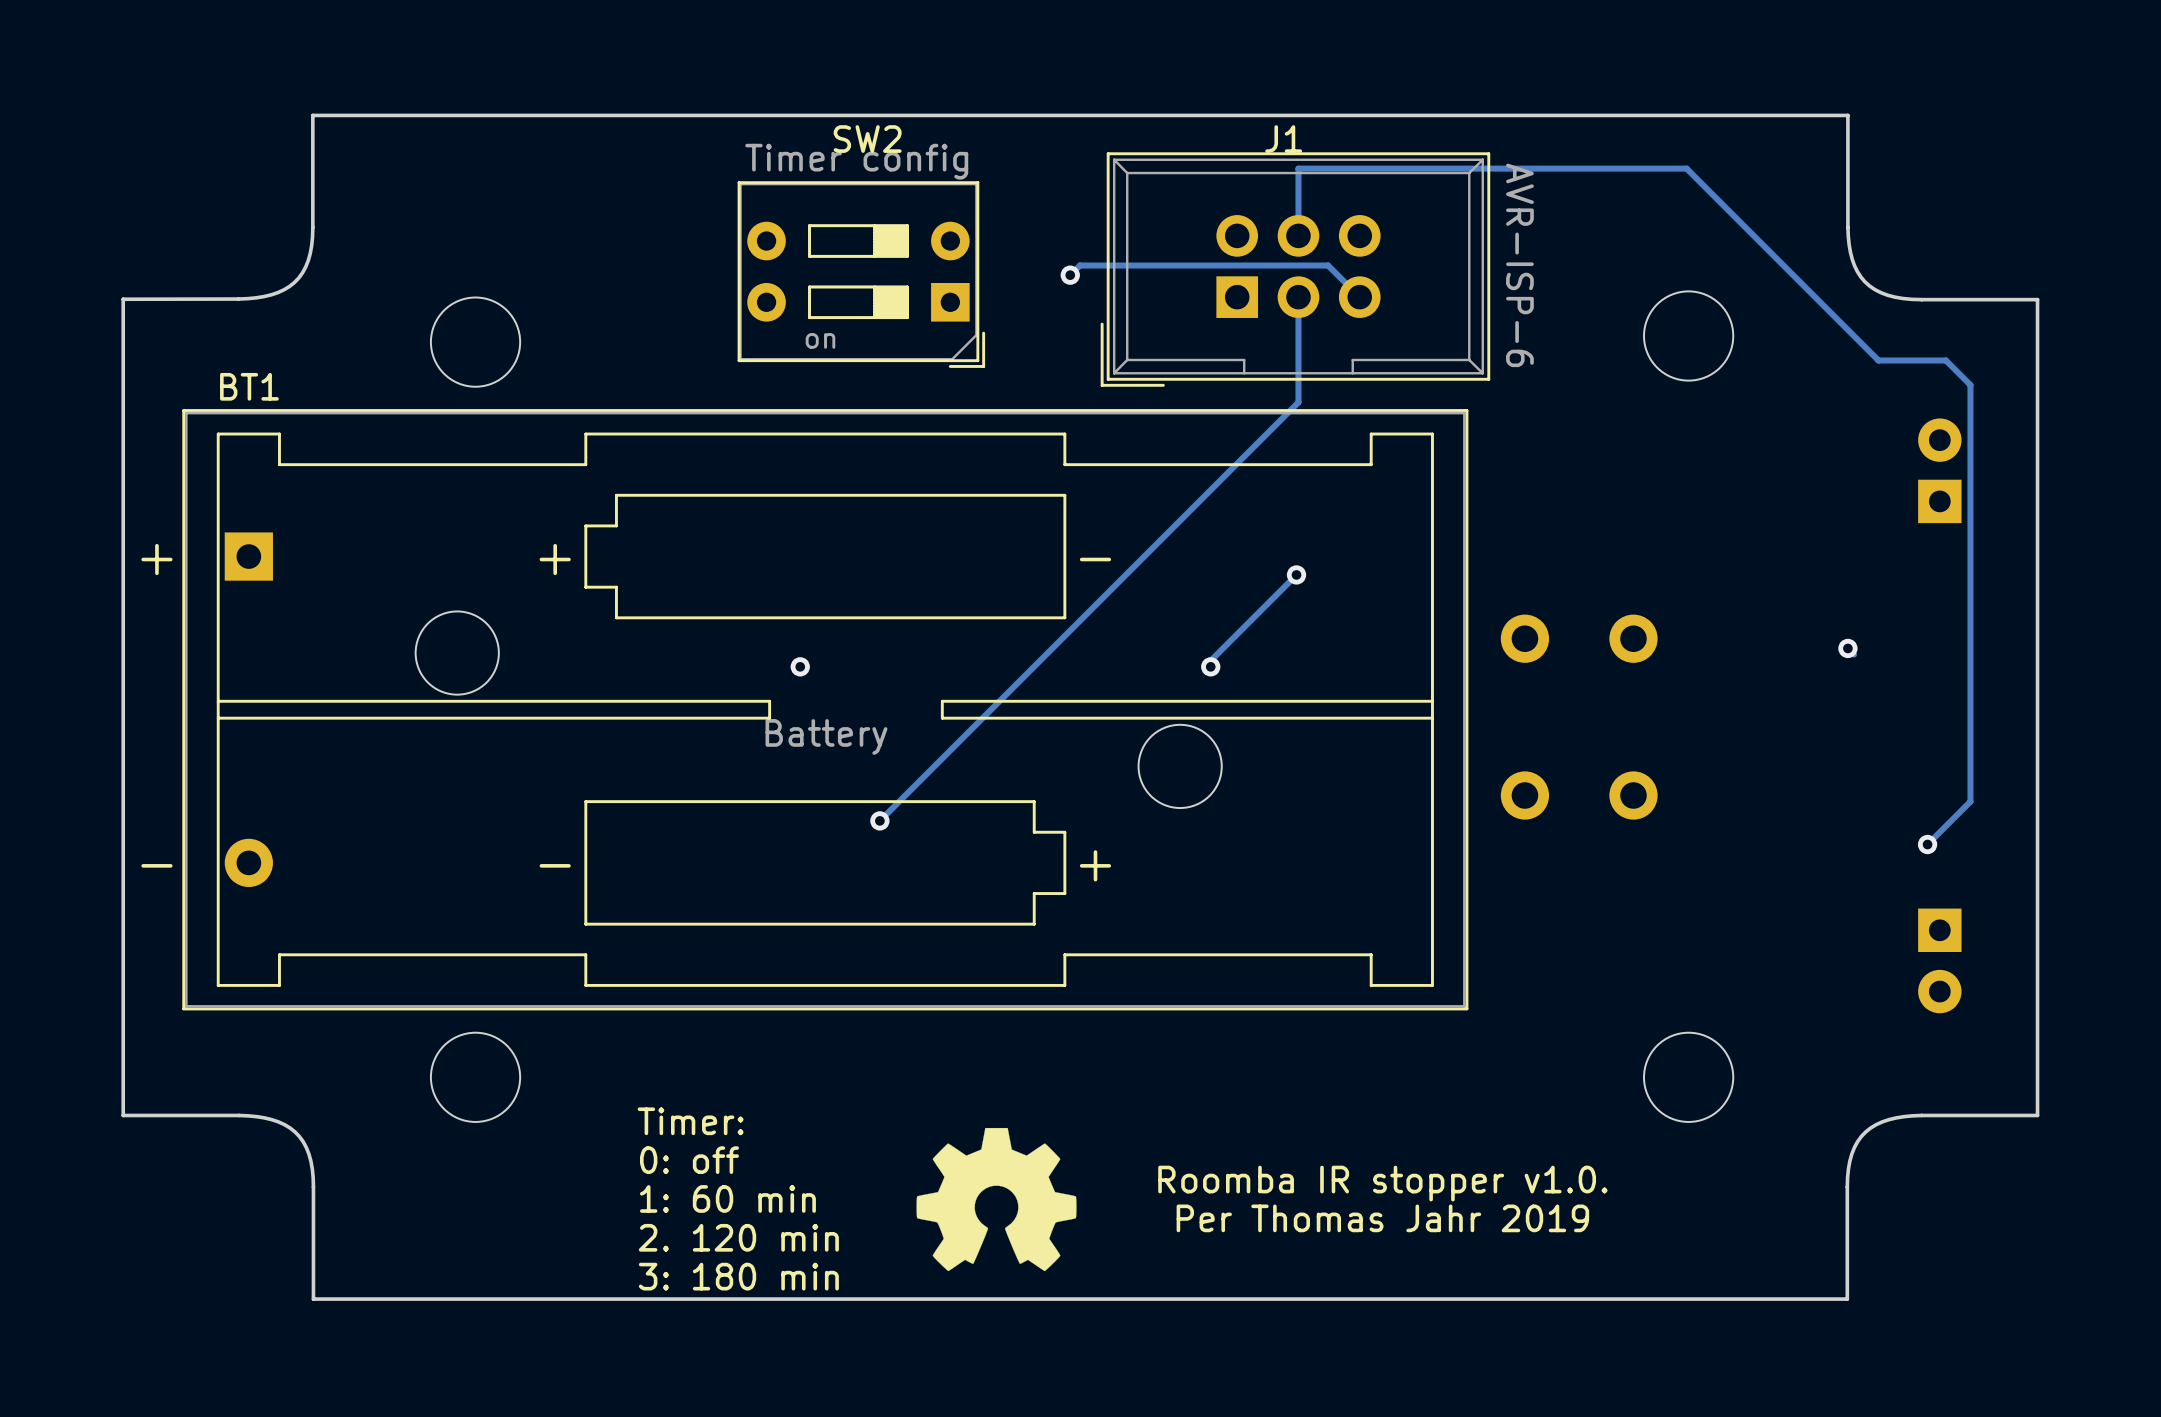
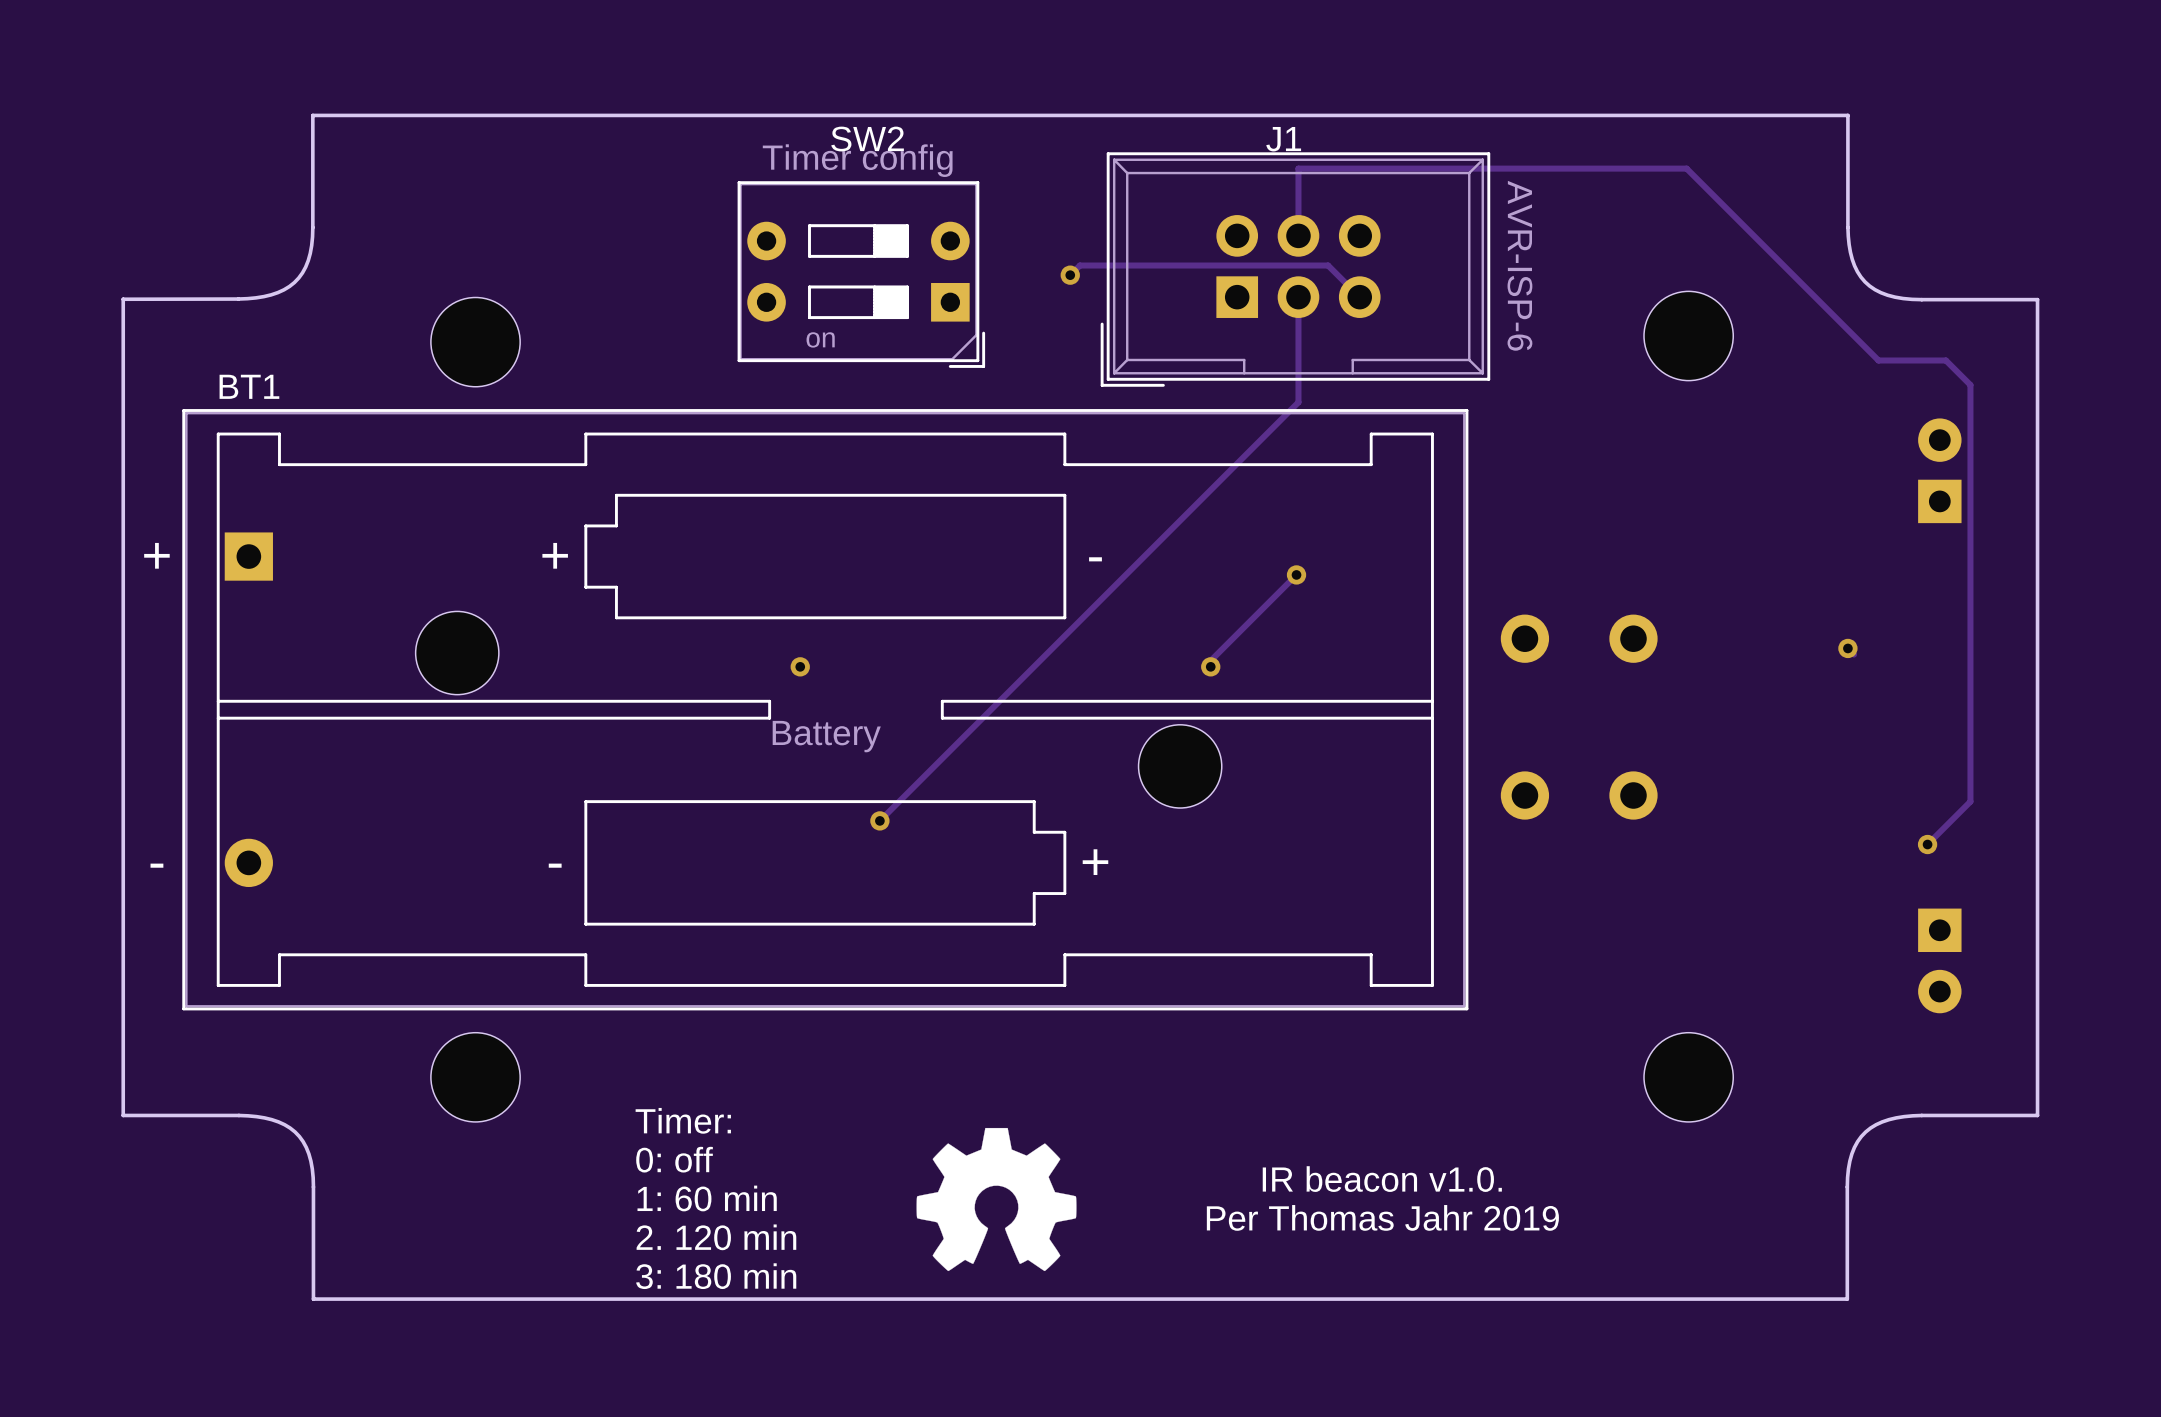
text: Roomba IR stopper v1.0. (1382, 1183) -> IR beacon v1.0. (1382, 1179)

